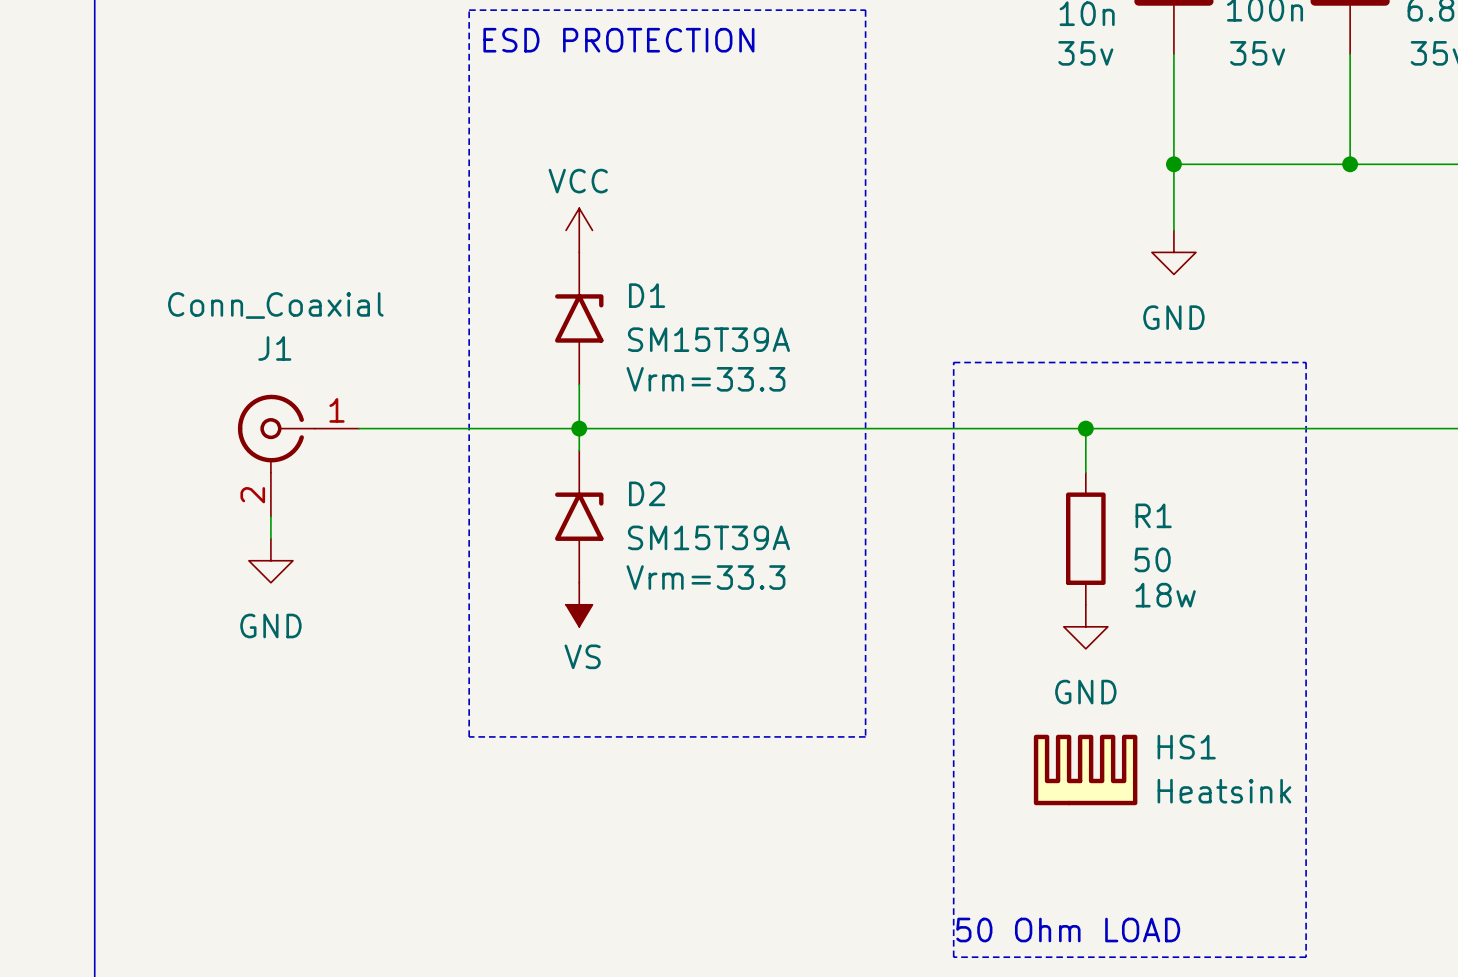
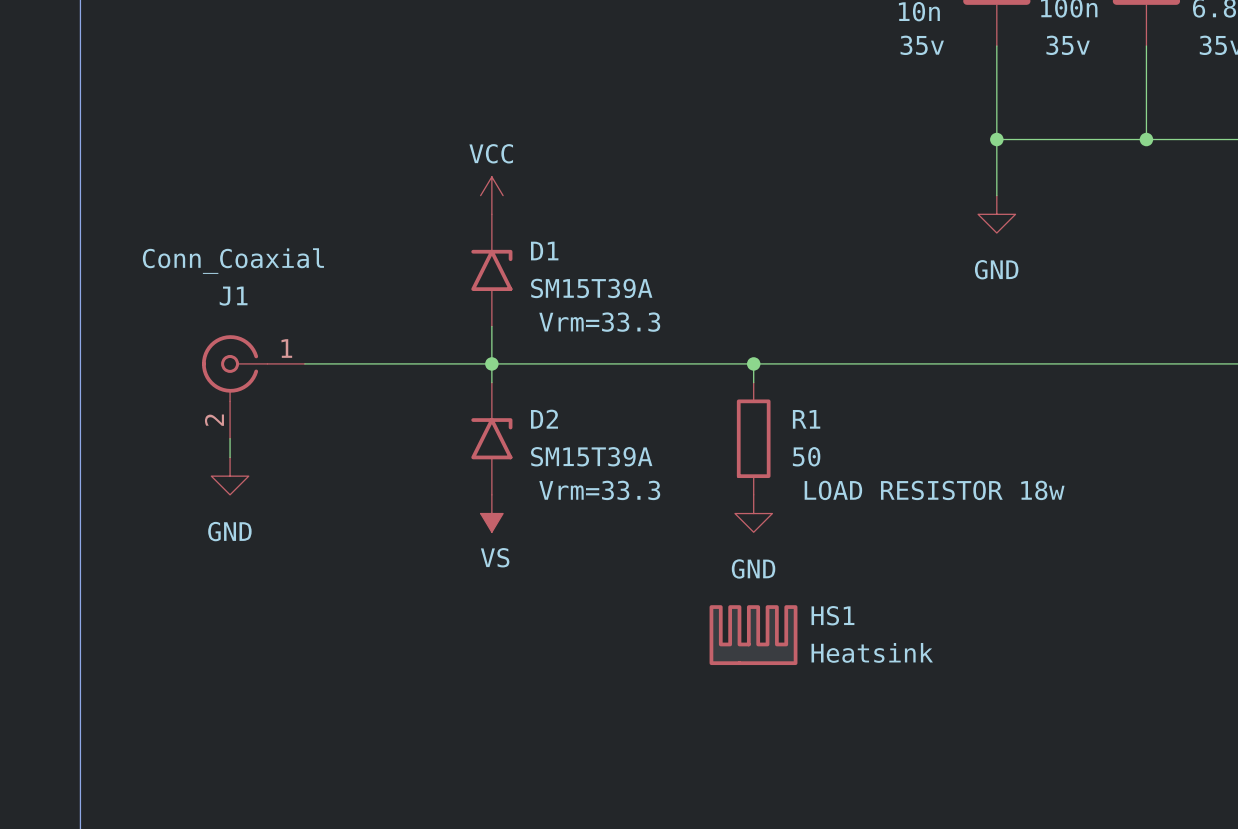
line: (469, 10) (865, 10) (865, 736) (469, 736) (469, 10) -> none
text: ESD PROTECTION (618, 40) -> none
line: (953, 362) (1306, 362) (1306, 957) (953, 957) (953, 362) -> none
wire: none -> (753, 363) (753, 382)
junction: none -> (753, 363)
wire: (1085, 428) (1085, 472) -> none
junction: (1085, 428) -> none
R1 position: (1085, 538) -> (753, 438)
R1 text: 18w (1165, 595) -> LOAD RESISTOR 18w (934, 490)
power symbol position: GND (1085, 626) -> GND (753, 513)
HS1 position: (1085, 769) -> (753, 635)
text: 50 Ohm LOAD (1068, 930) -> none

